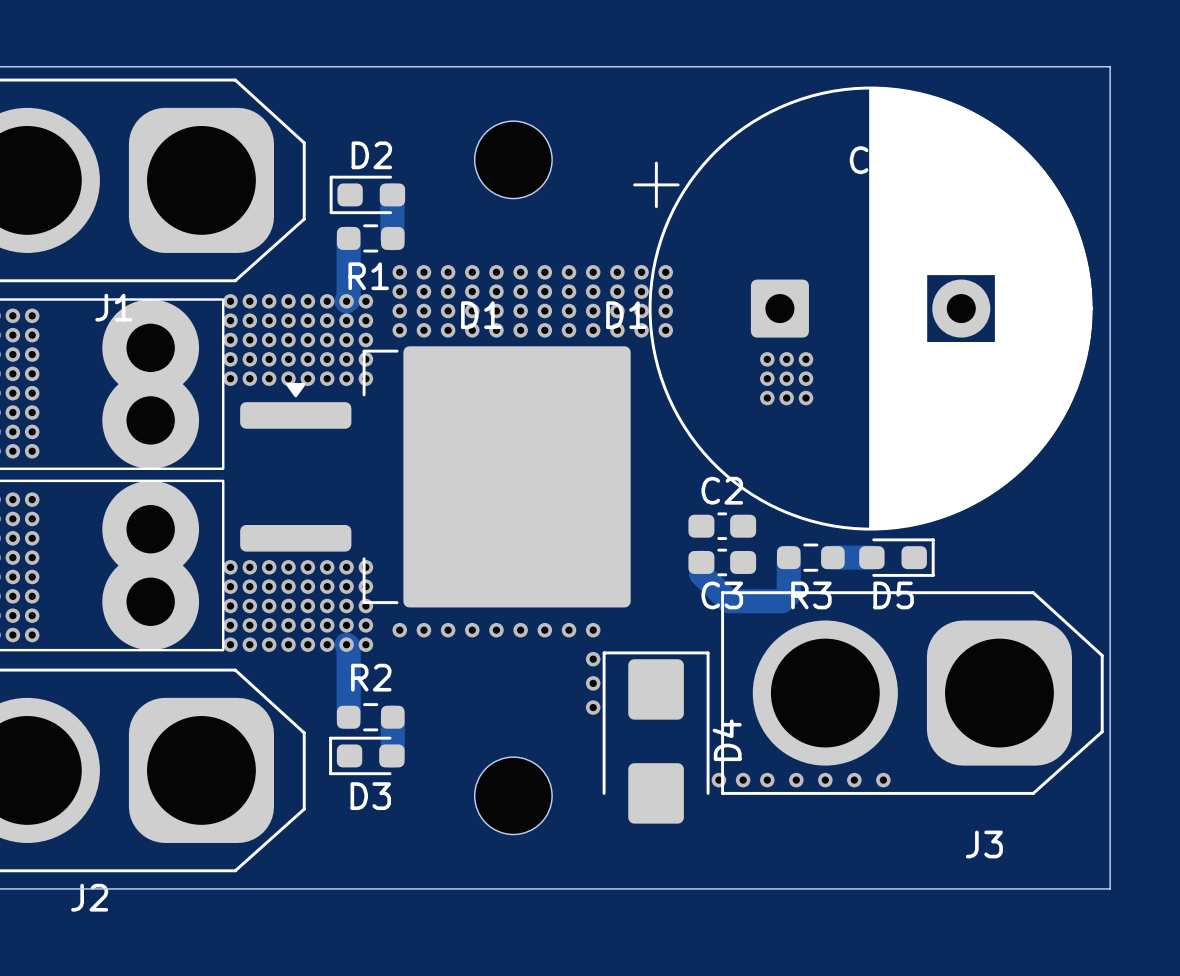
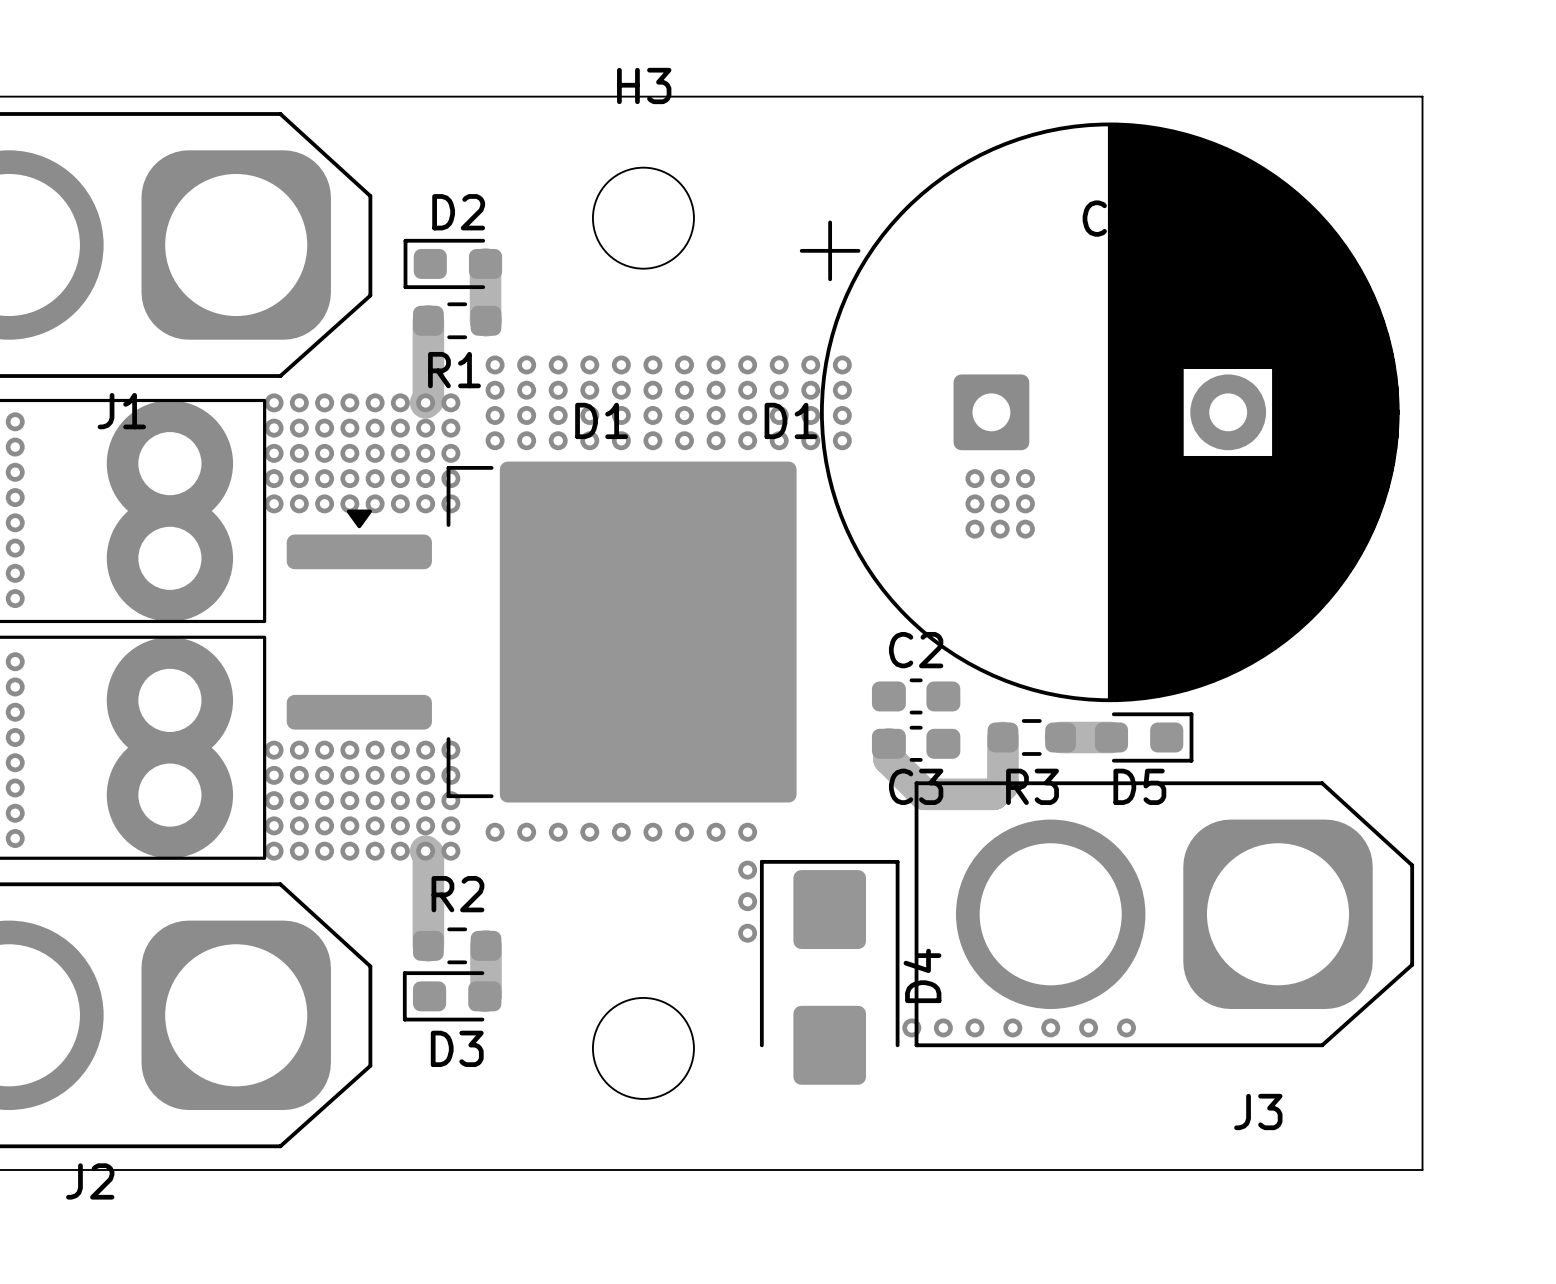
H3 name: none -> H3 (644, 85)

